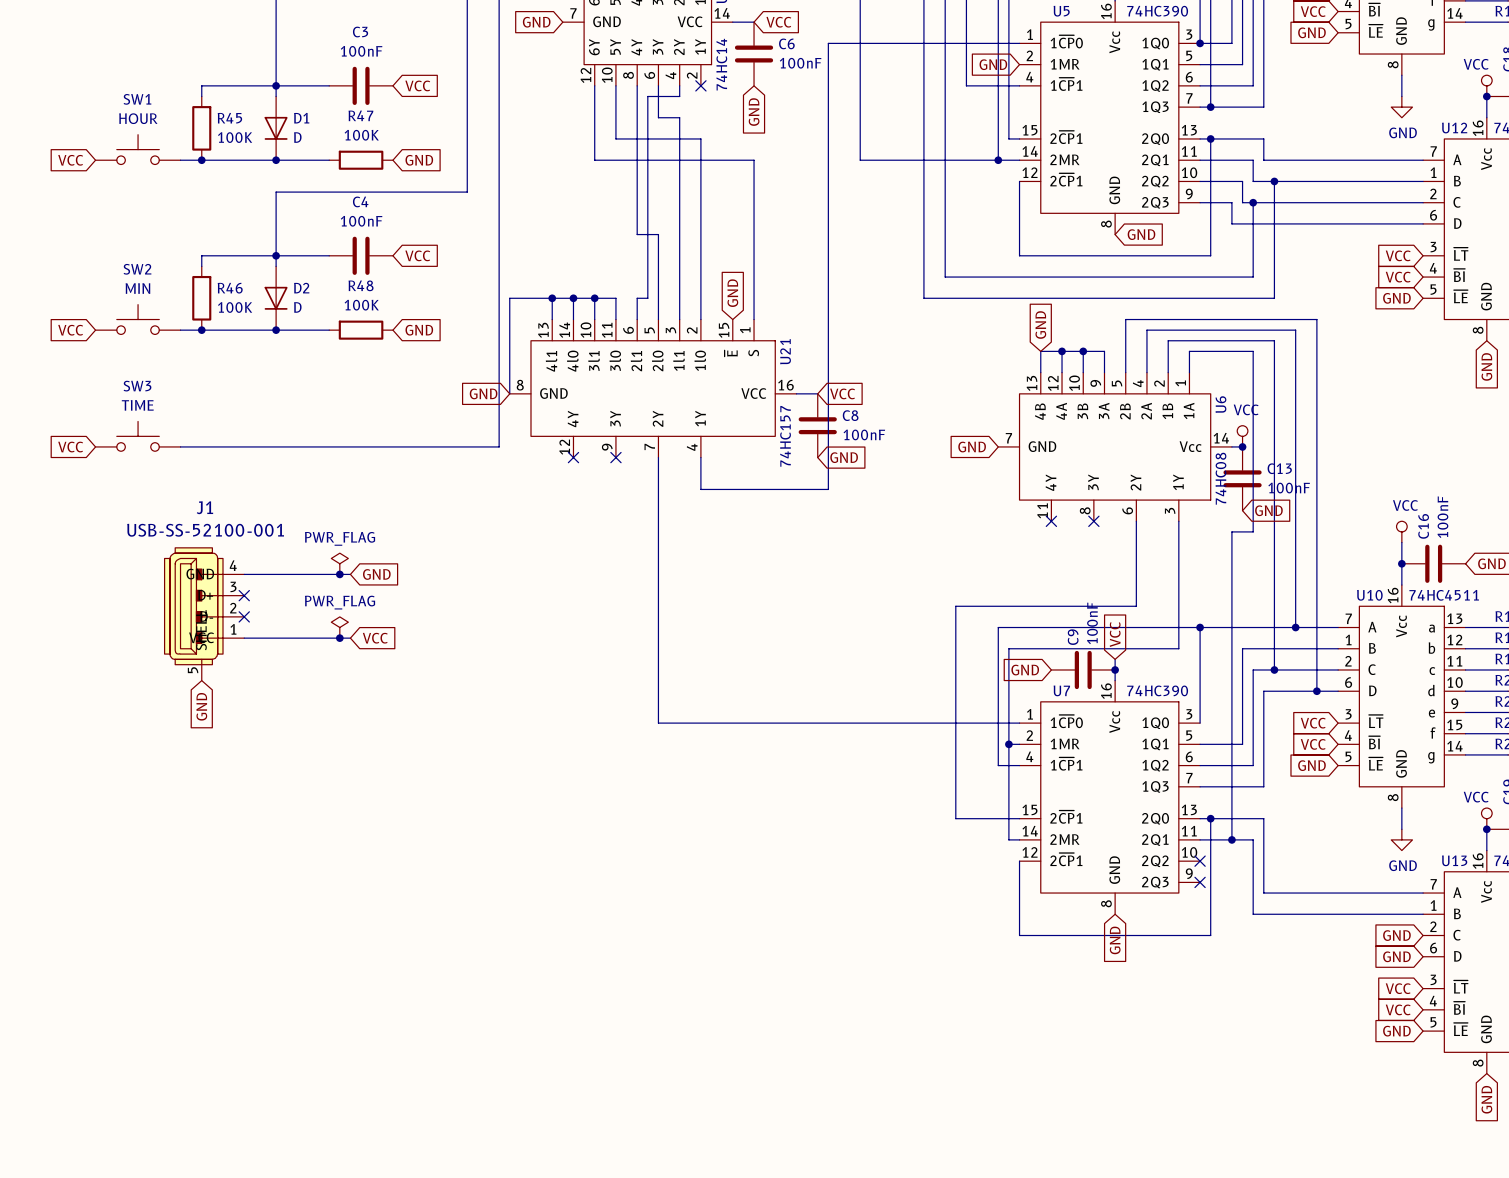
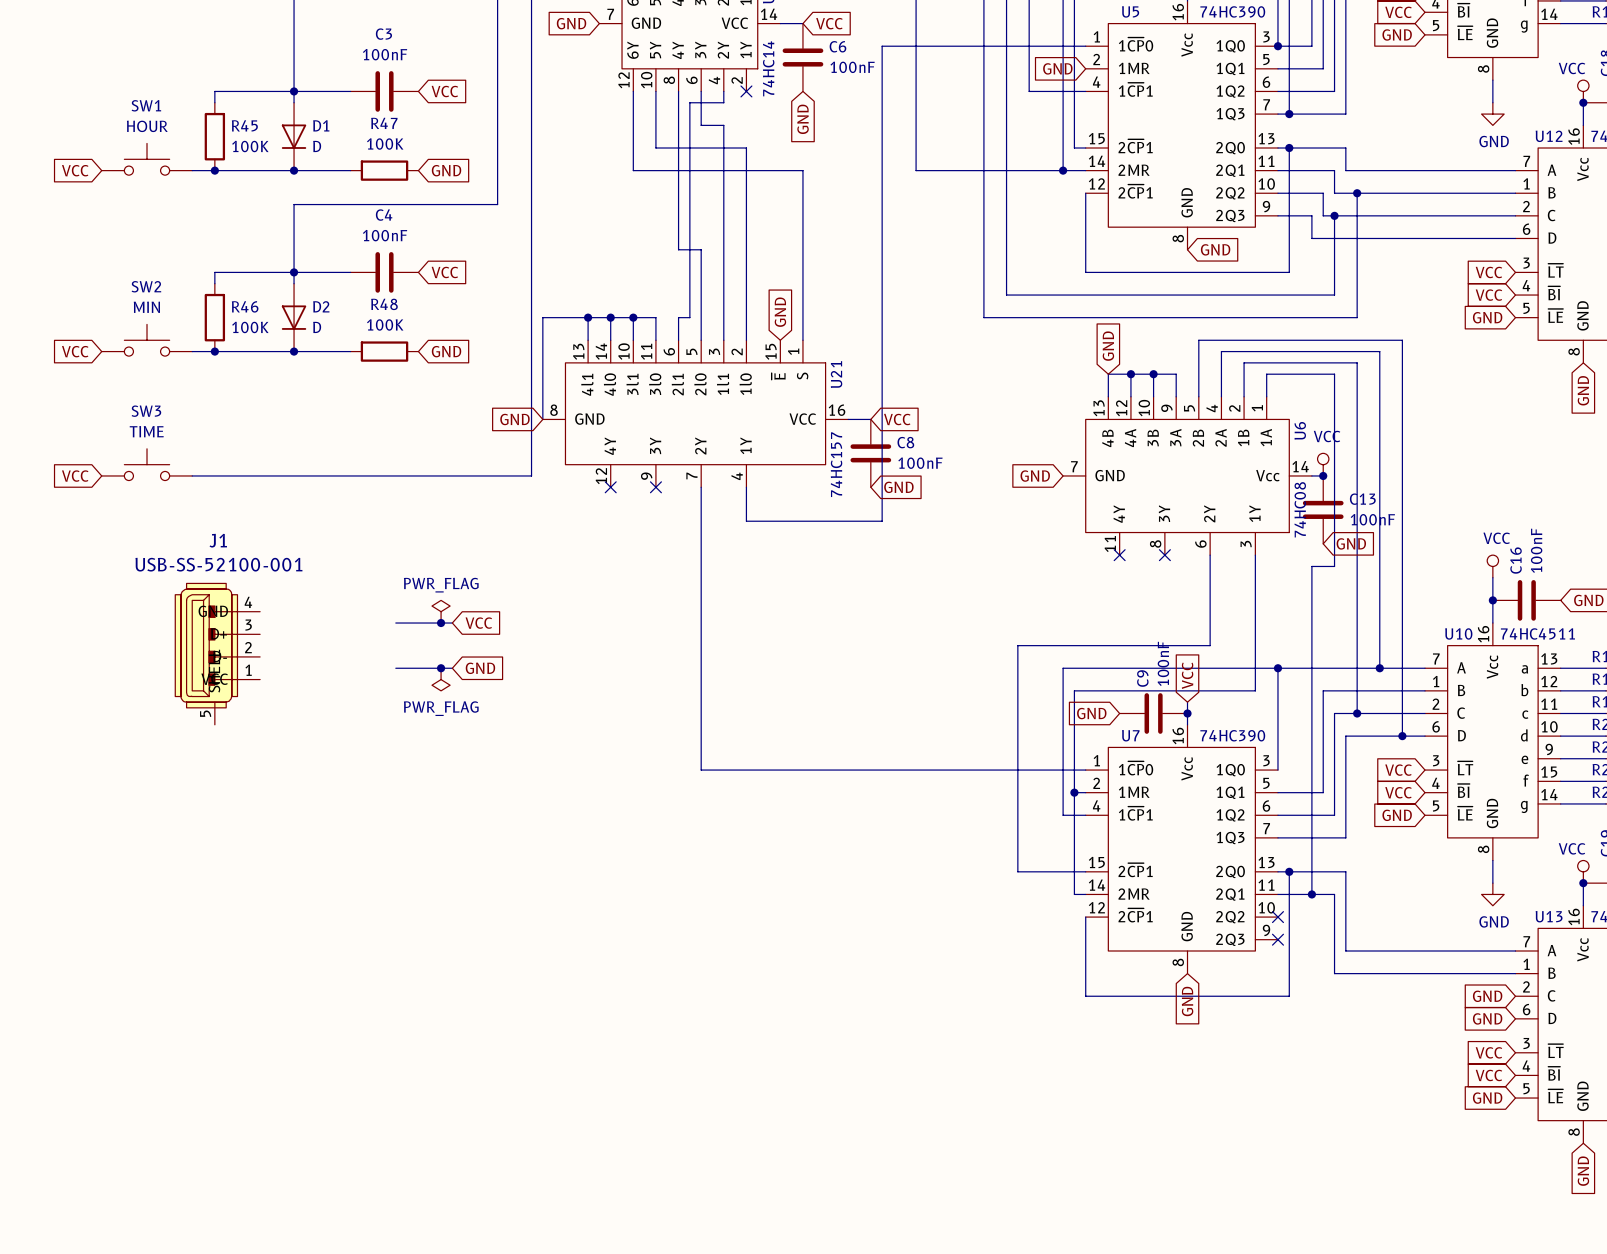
power symbol: PWR_FLAG (339, 563) -> none
wire: (244, 574) (350, 574) -> none
junction: (339, 574) -> none
global label position: GND (376, 574) -> GND (480, 668)
power symbol: none -> PWR_FLAG (441, 611)
wire: none -> (395, 623) (452, 623)
junction: none -> (441, 623)
no-connect mark: (244, 595) -> none
no-connect mark: (244, 616) -> none
power symbol: PWR_FLAG (339, 627) -> none
wire: none -> (395, 668) (452, 668)
junction: none -> (441, 668)
wire: (244, 638) (350, 638) -> none
junction: (339, 638) -> none
global label position: VCC (375, 638) -> VCC (478, 623)
power symbol: none -> PWR_FLAG (441, 679)
global label: GND (201, 706) -> none

